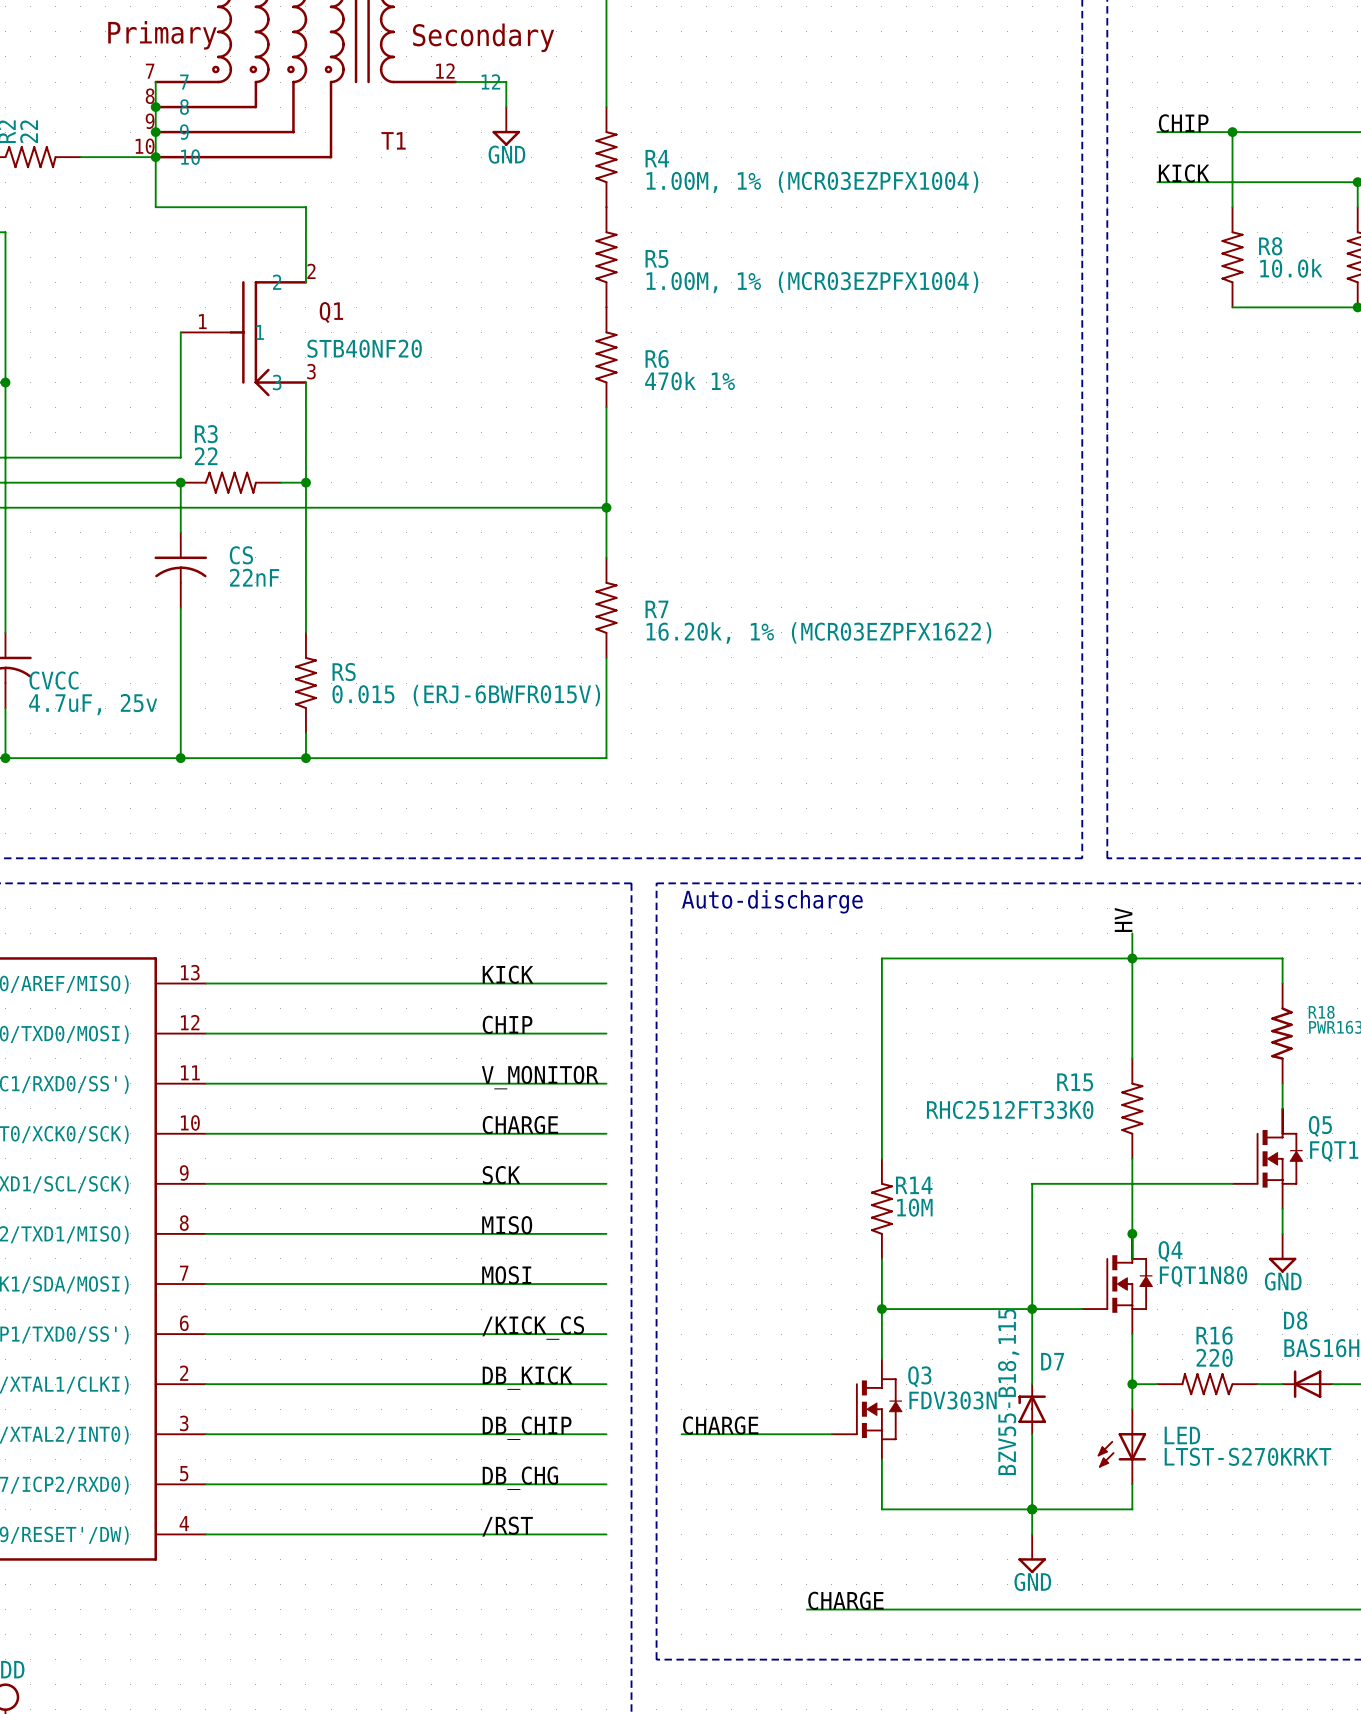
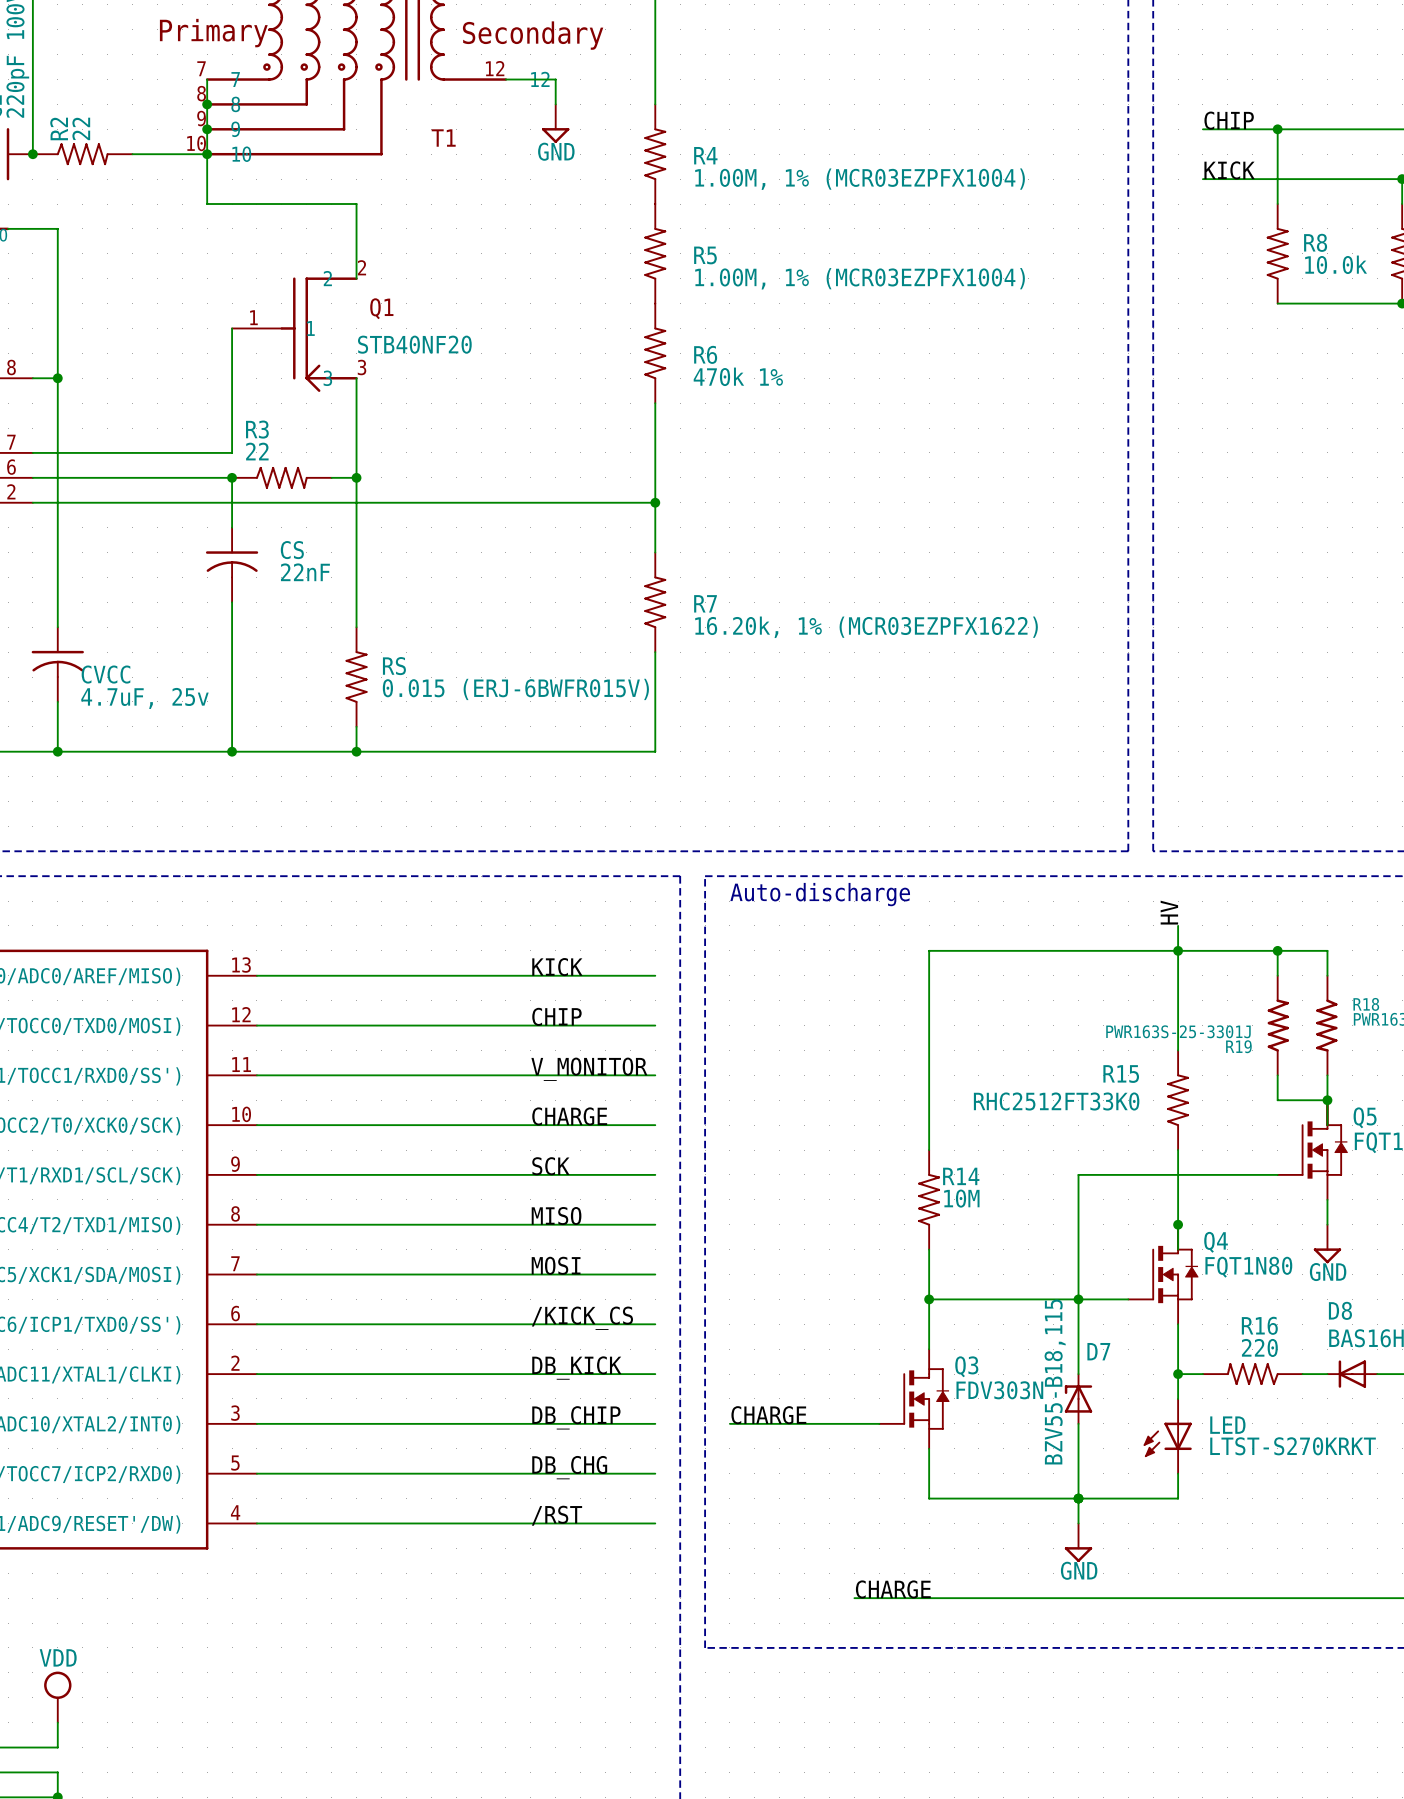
wire: none -> (1277, 950) (1277, 975)
junction: none -> (1277, 950)
R19: none -> PWR163S-25-3301J (1278, 1025)
wire: none -> (1277, 1075) (1277, 1100) (1327, 1100) (1327, 1125)
junction: none -> (1327, 1100)

